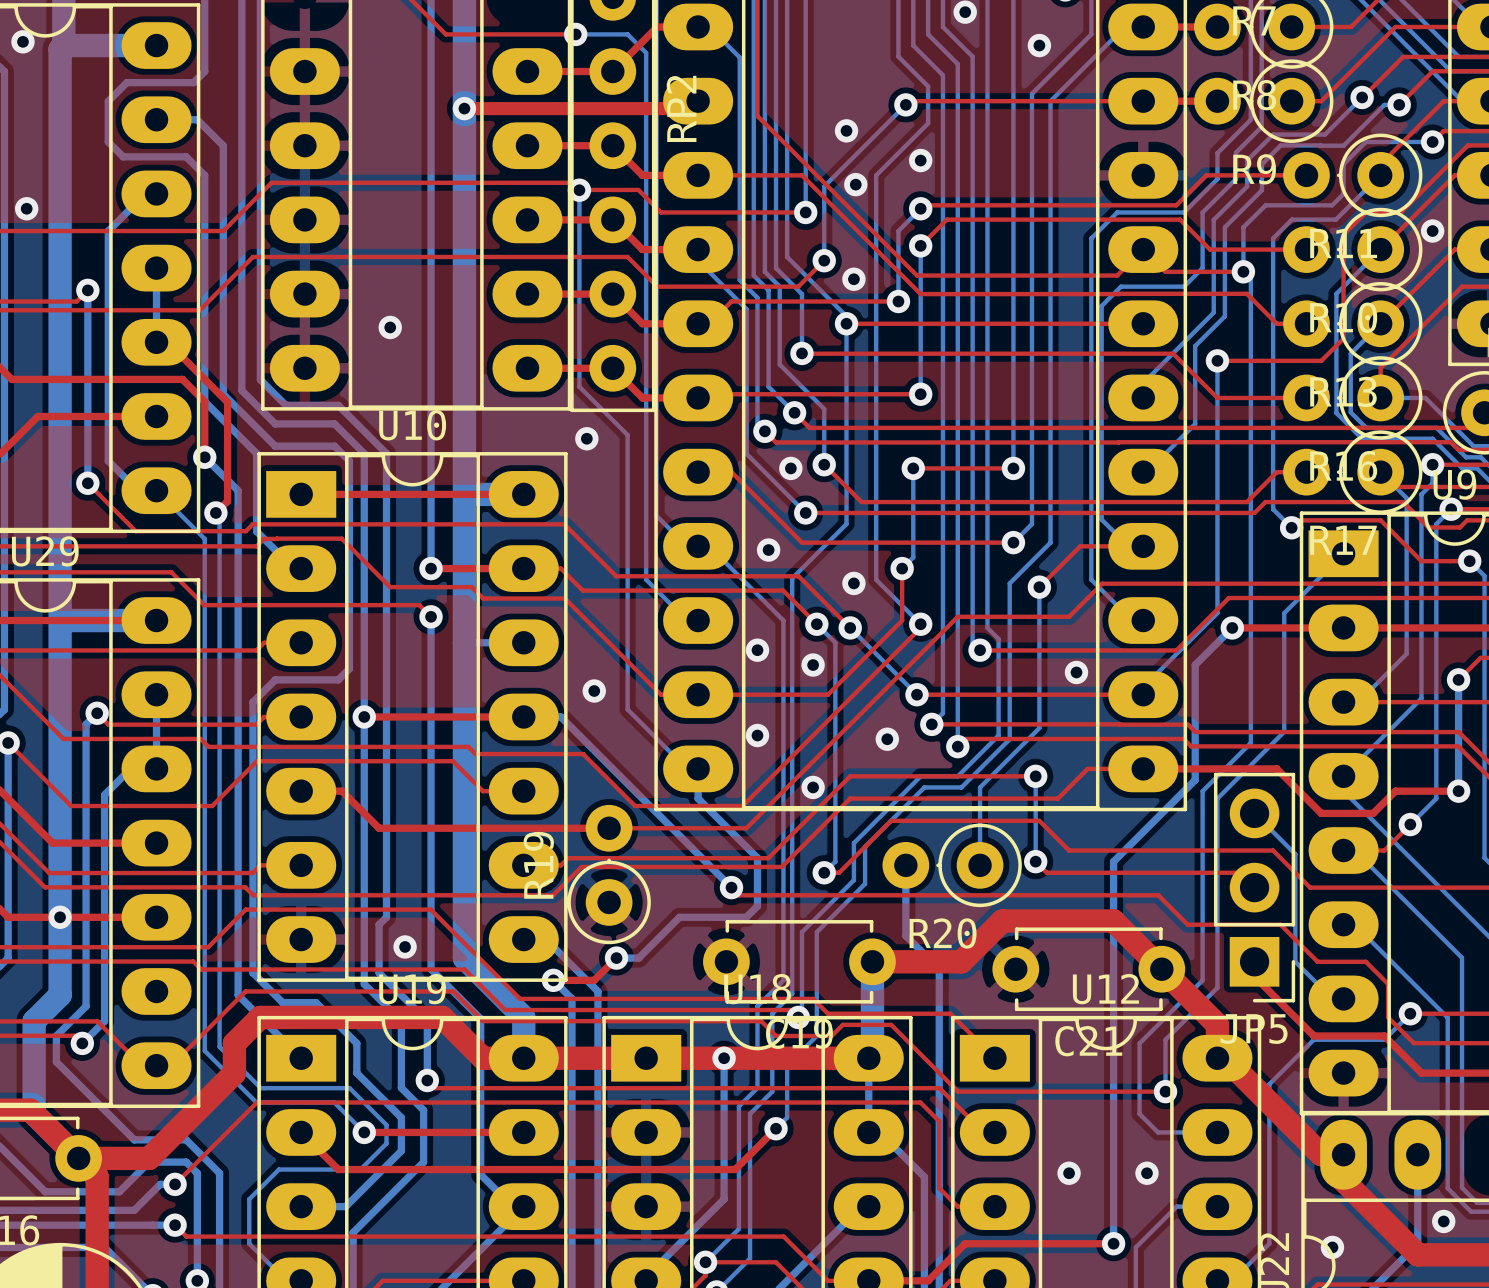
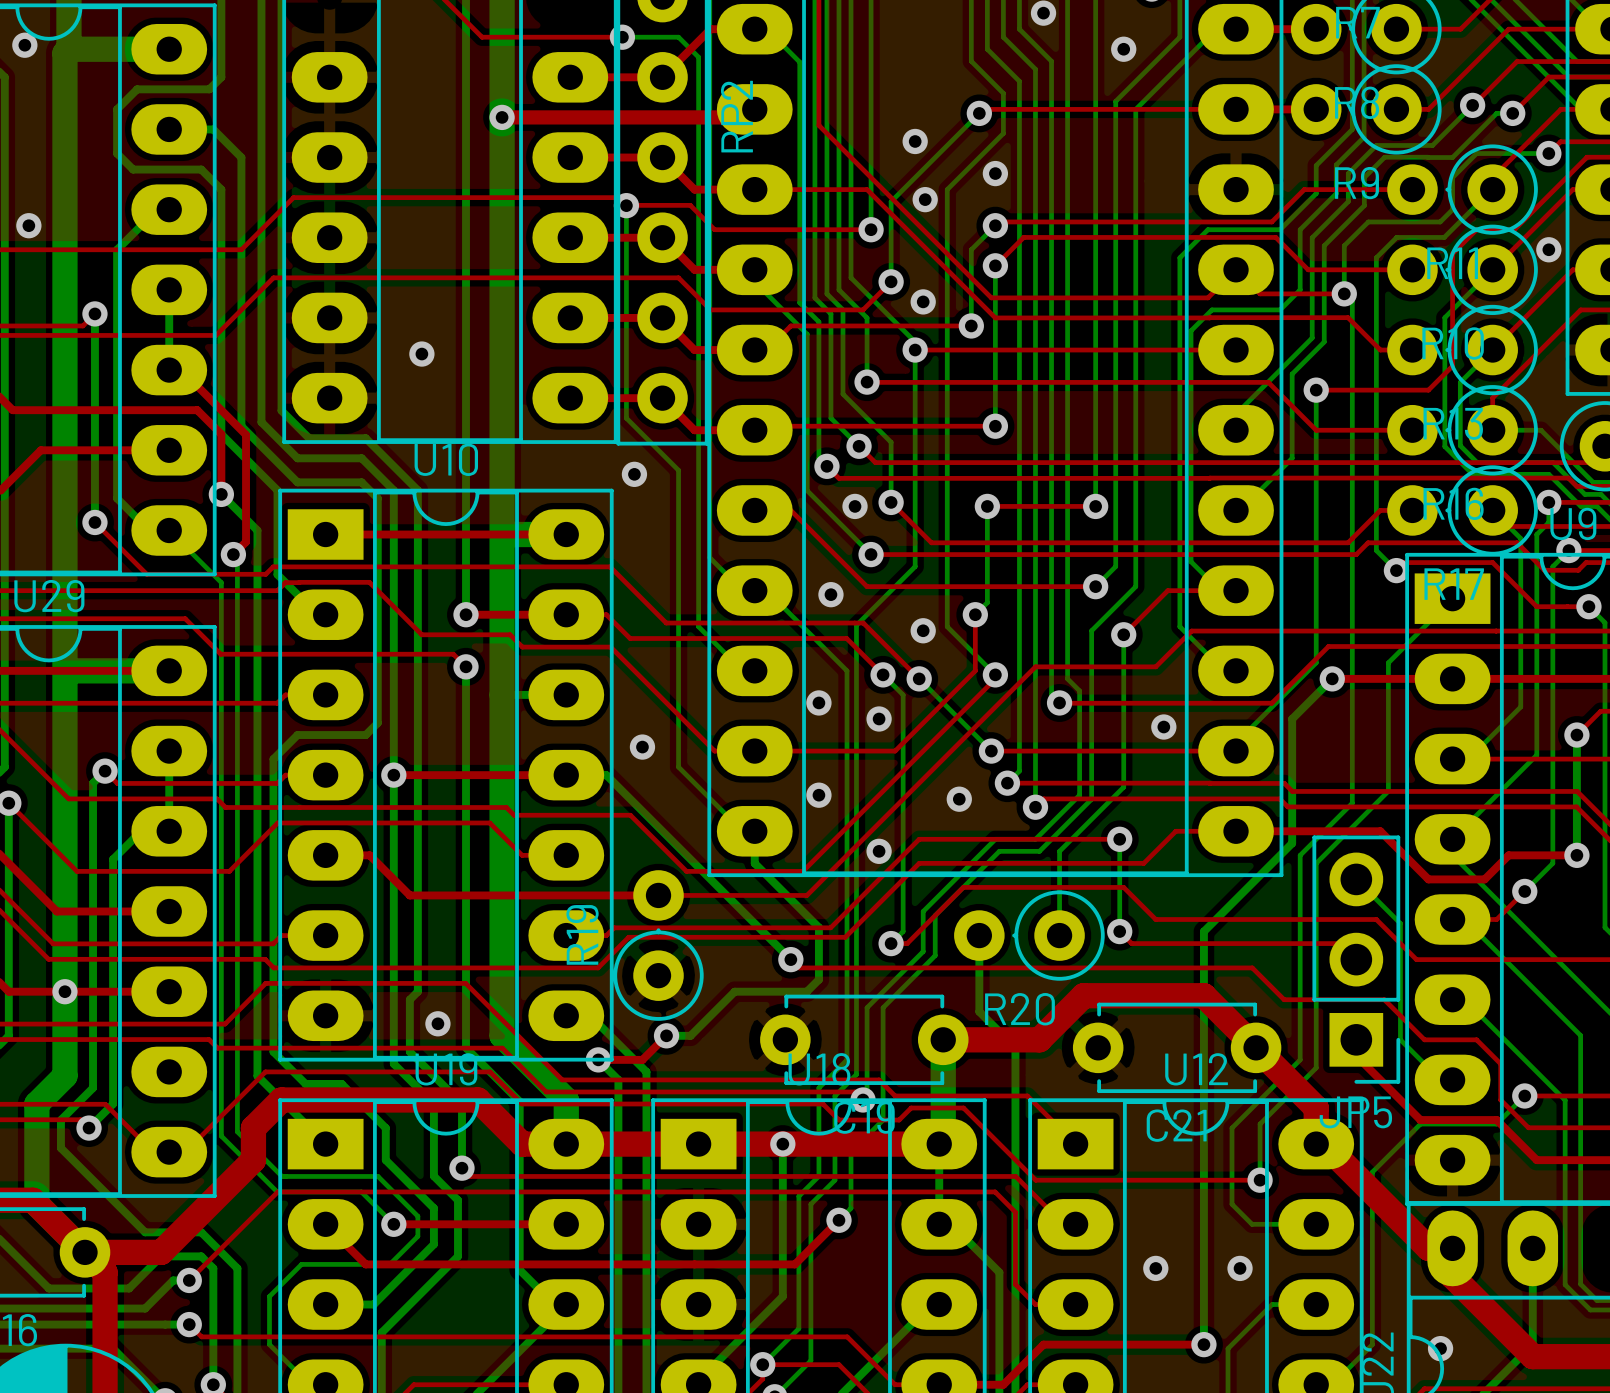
via: (1443, 1221) -> none

